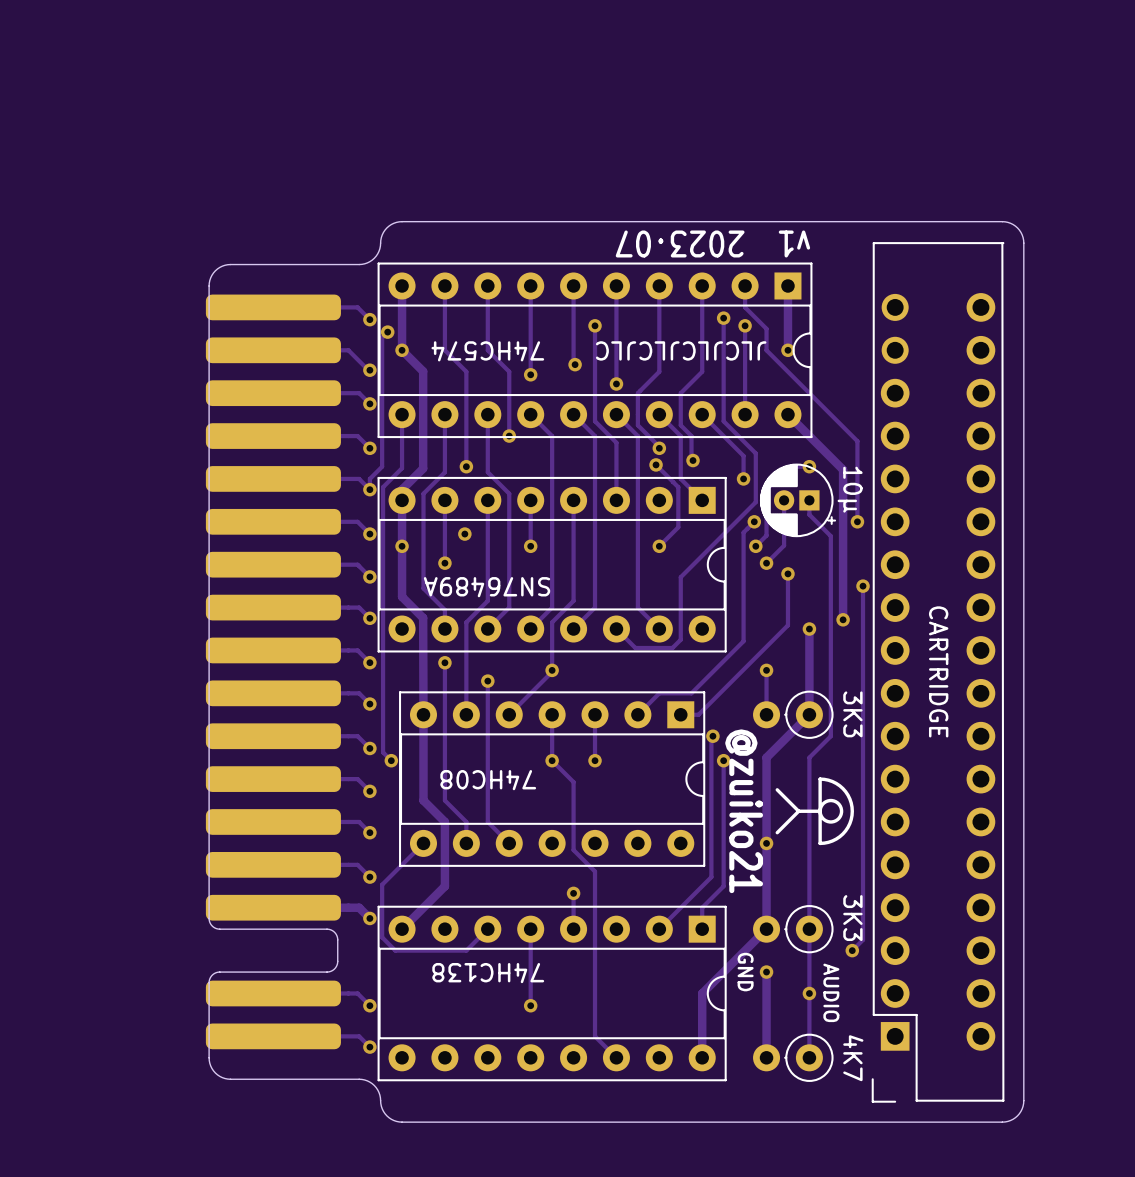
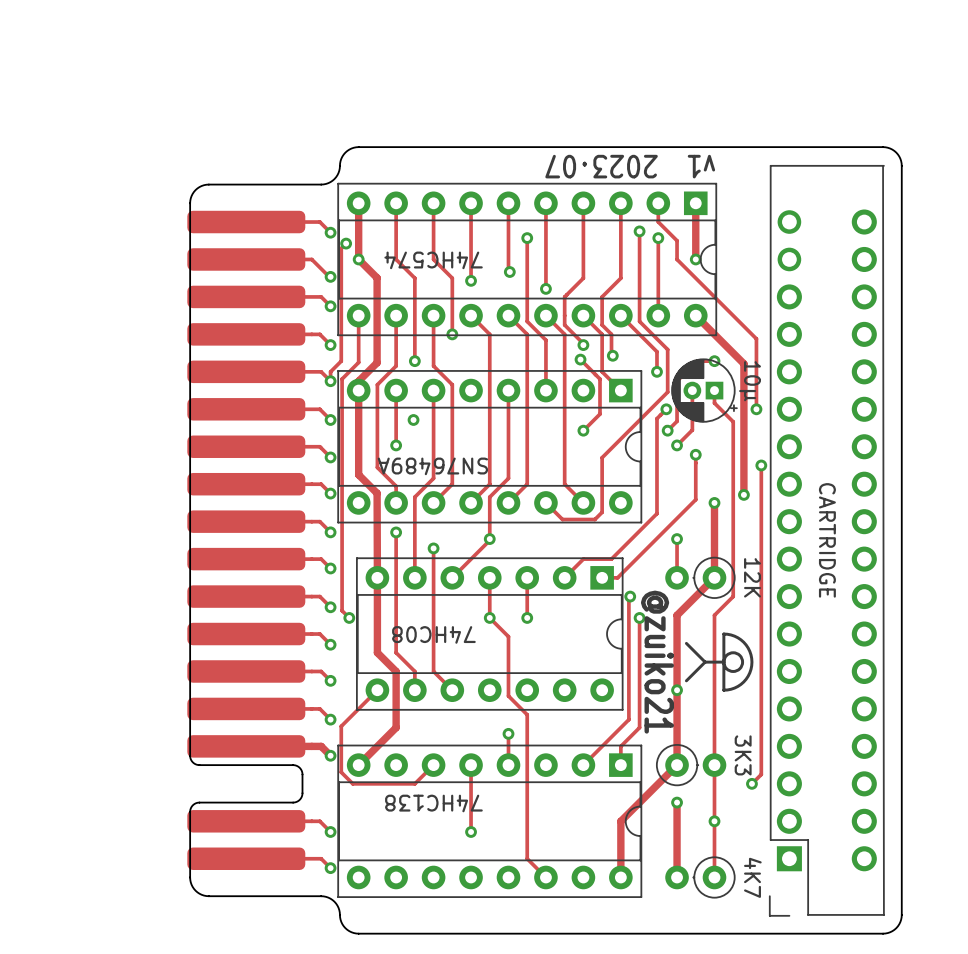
text: JLCJLCJLCJLC (681, 350) -> none
track: (530, 500) (530, 546) -> none
via: (402, 546) -> none
via: (530, 546) -> none
part value: 3K3 (852, 714) -> 12K (752, 577)
part rotation: 0° (793, 929) -> 180° (691, 765)
text: GND (745, 972) -> none
text: AUDIO (831, 992) -> none

